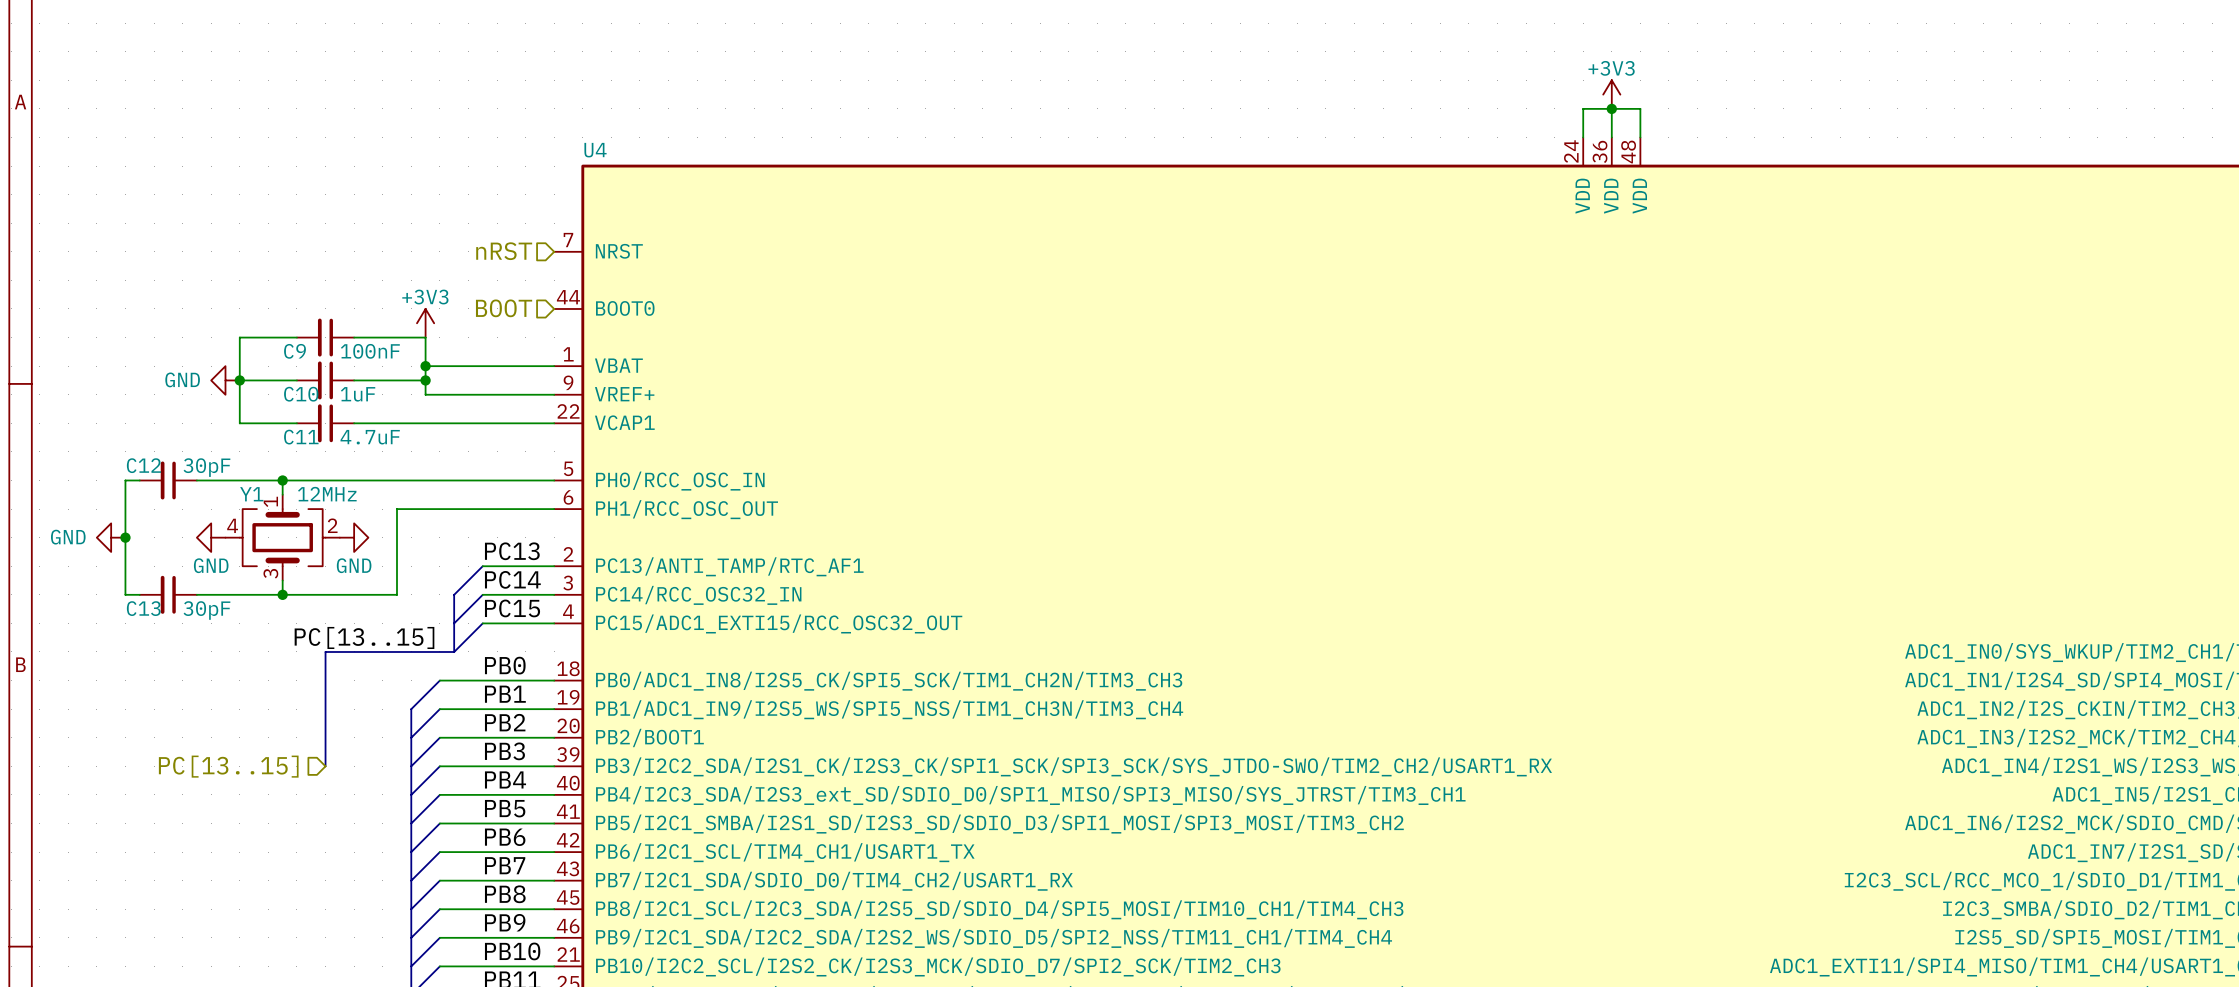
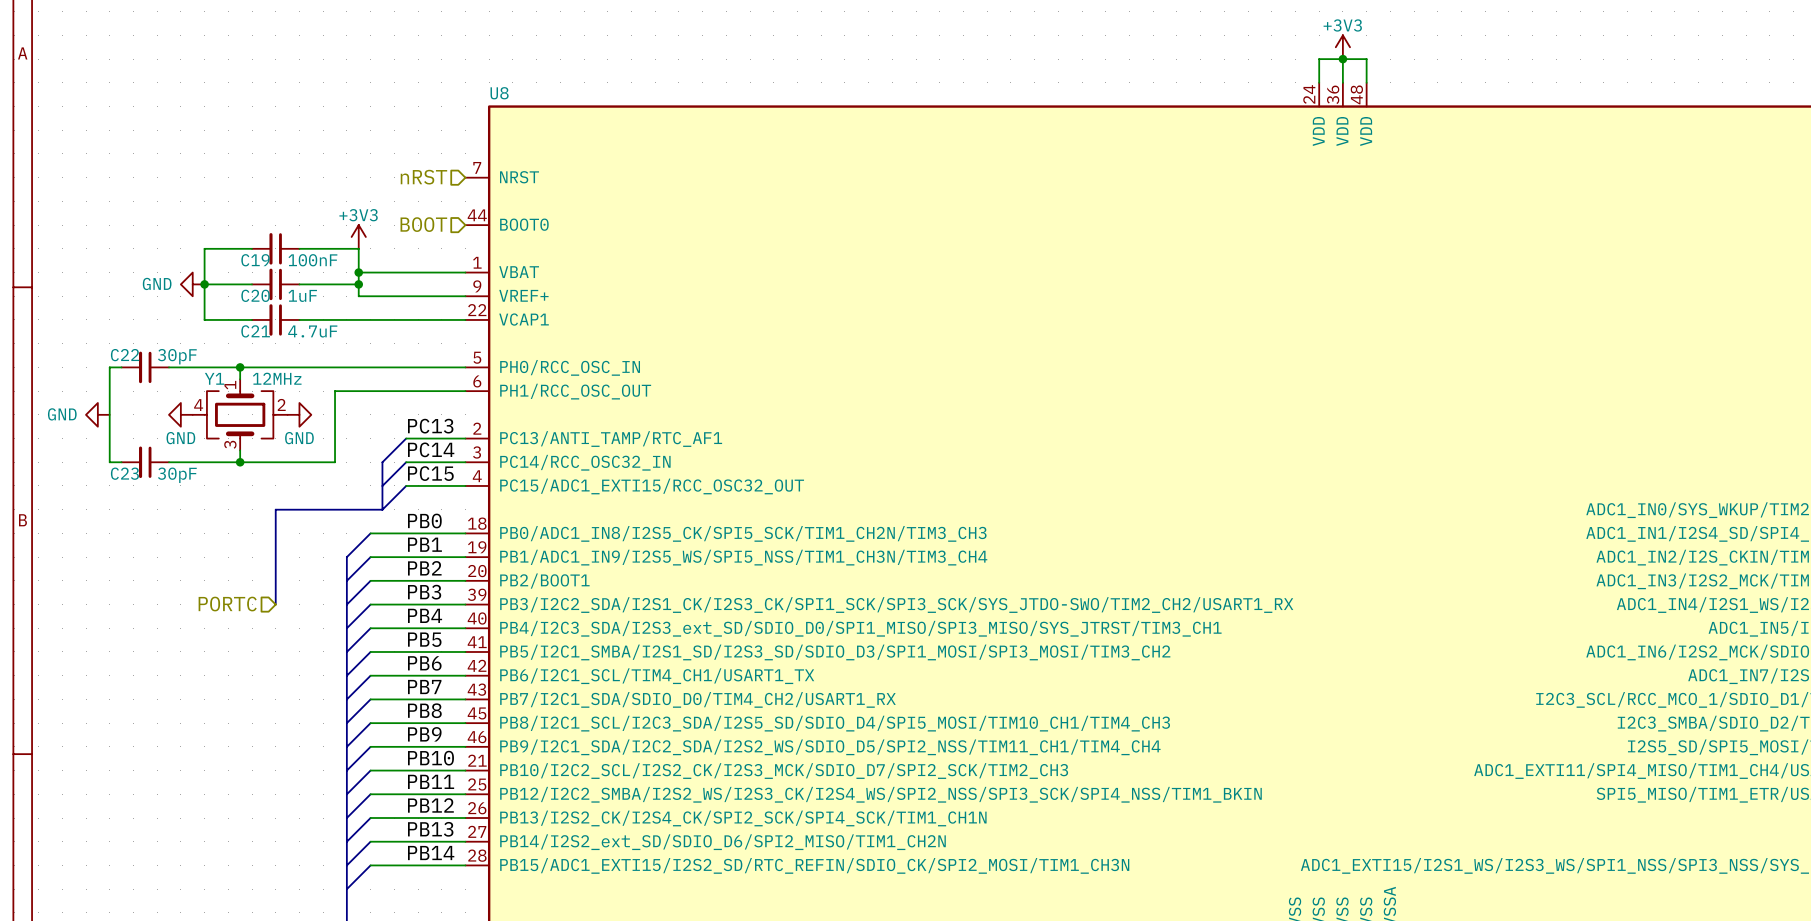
U4 name: U4 (595, 150) -> U8 (499, 93)
C9 name: C9 (295, 351) -> C19 (255, 260)
C10 name: C10 (301, 394) -> C20 (255, 295)
C11 name: C11 (301, 437) -> C21 (255, 331)
C12 name: C12 (143, 465) -> C22 (125, 355)
junction: (125, 537) -> none
C13 name: C13 (143, 608) -> C23 (124, 473)
label: PC[13..15] (364, 637) -> none
hierarchical label: PC[13..15] (228, 766) -> PORTC (227, 604)

